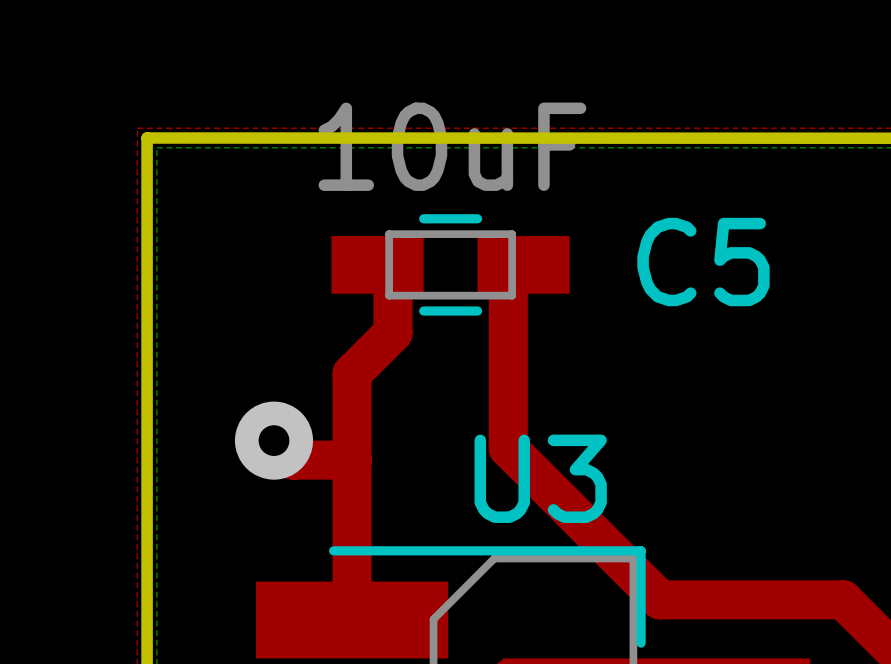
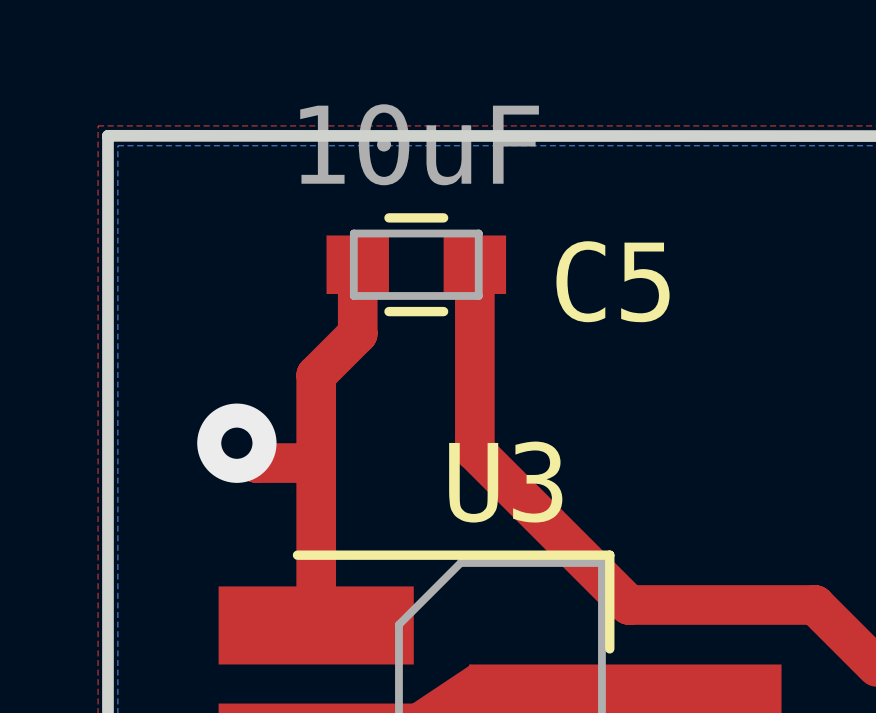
C5 footprint: [331, 214, 570, 316] -> [326, 213, 507, 317]
C5 name position: C5 (703, 262) -> C5 (613, 281)

